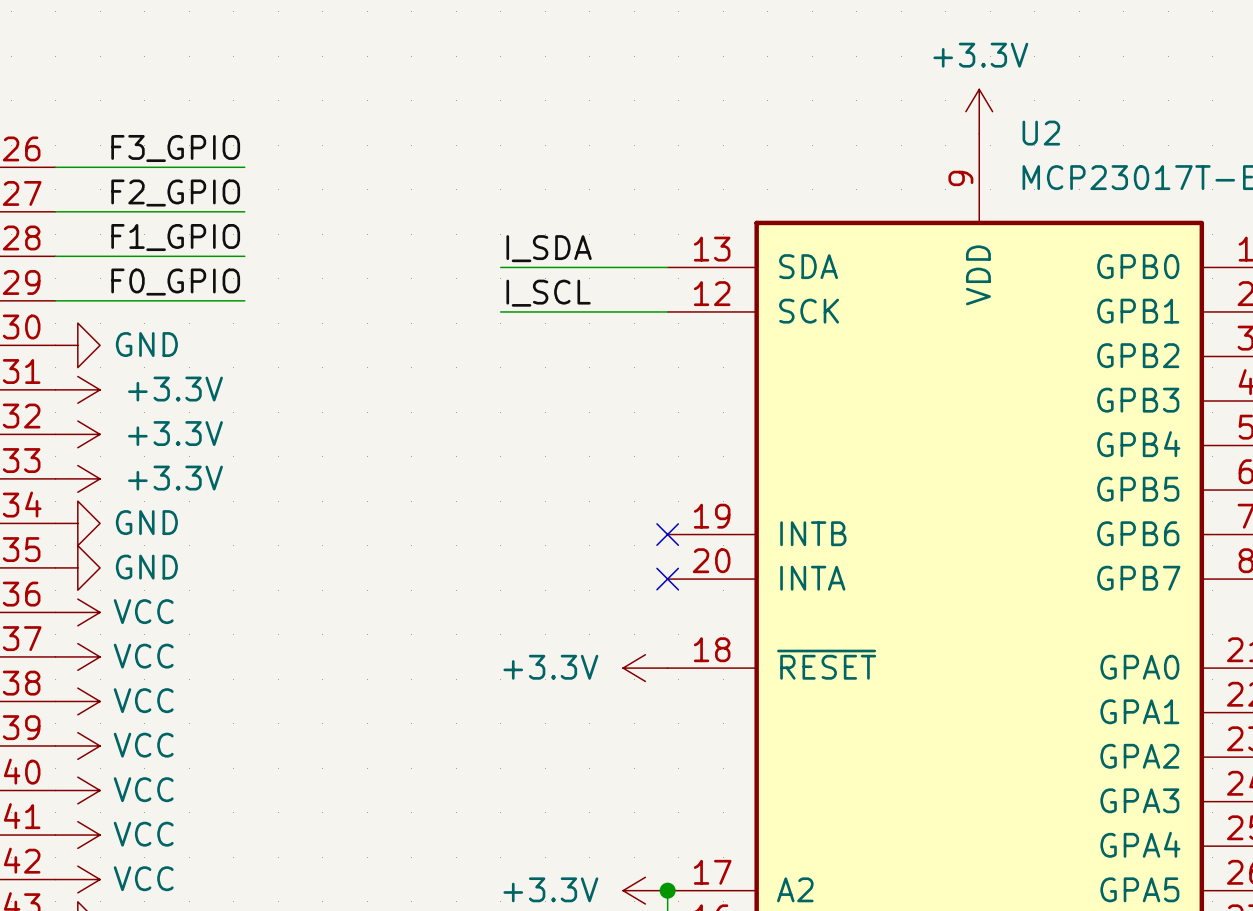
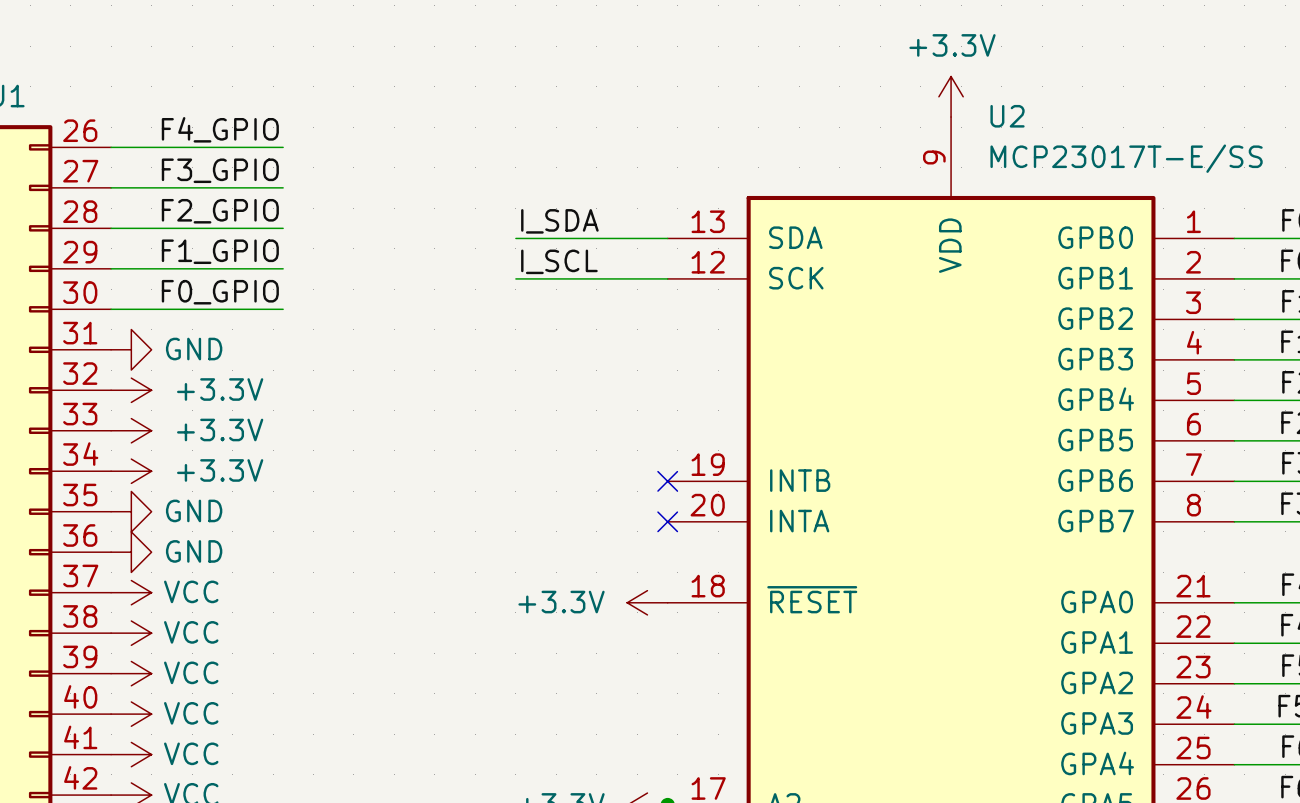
label: F3_GPIO (175, 148) -> F4_GPIO (220, 129)
label: F2_GPIO (175, 193) -> F3_GPIO (220, 170)
label: F1_GPIO (175, 237) -> F2_GPIO (220, 211)
label: F0_GPIO (175, 282) -> F1_GPIO (220, 251)
label: none -> F0_GPIO (220, 292)
wire: none -> (111, 309) (283, 309)
power symbol: GND (77, 345) -> none
power symbol: +3.3V (77, 389) -> GND (131, 349)
power symbol: GND (77, 523) -> +3.3V (131, 471)
power symbol: VCC (77, 612) -> GND (131, 552)

